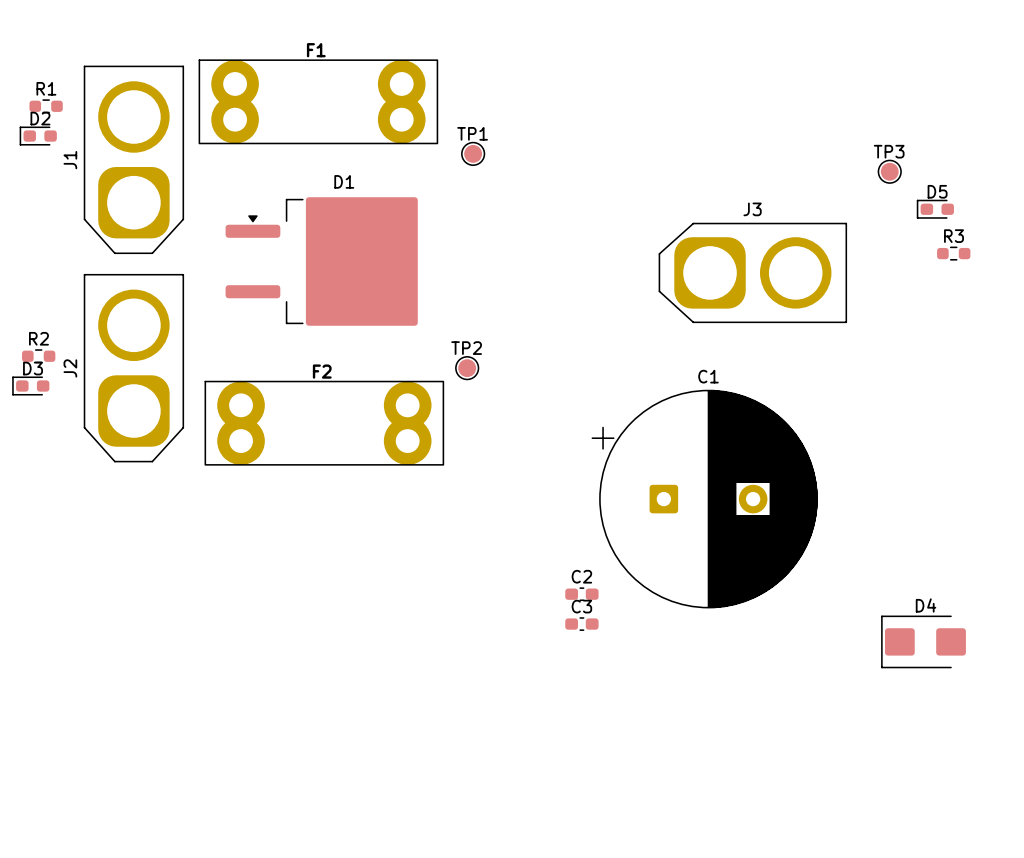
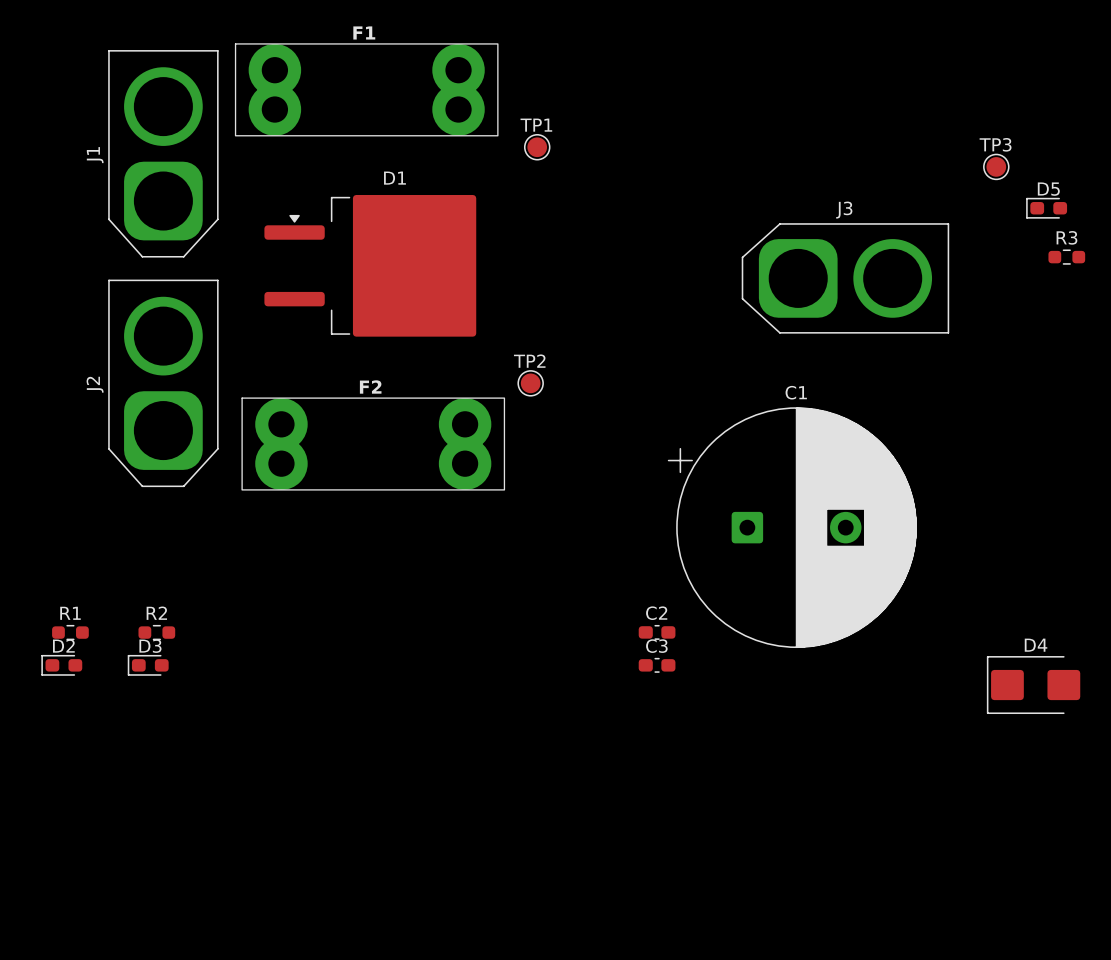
R1 position: (46, 106) -> (70, 632)
D2 position: (38, 136) -> (61, 665)
R2 position: (38, 356) -> (156, 632)
D3 position: (30, 386) -> (148, 665)

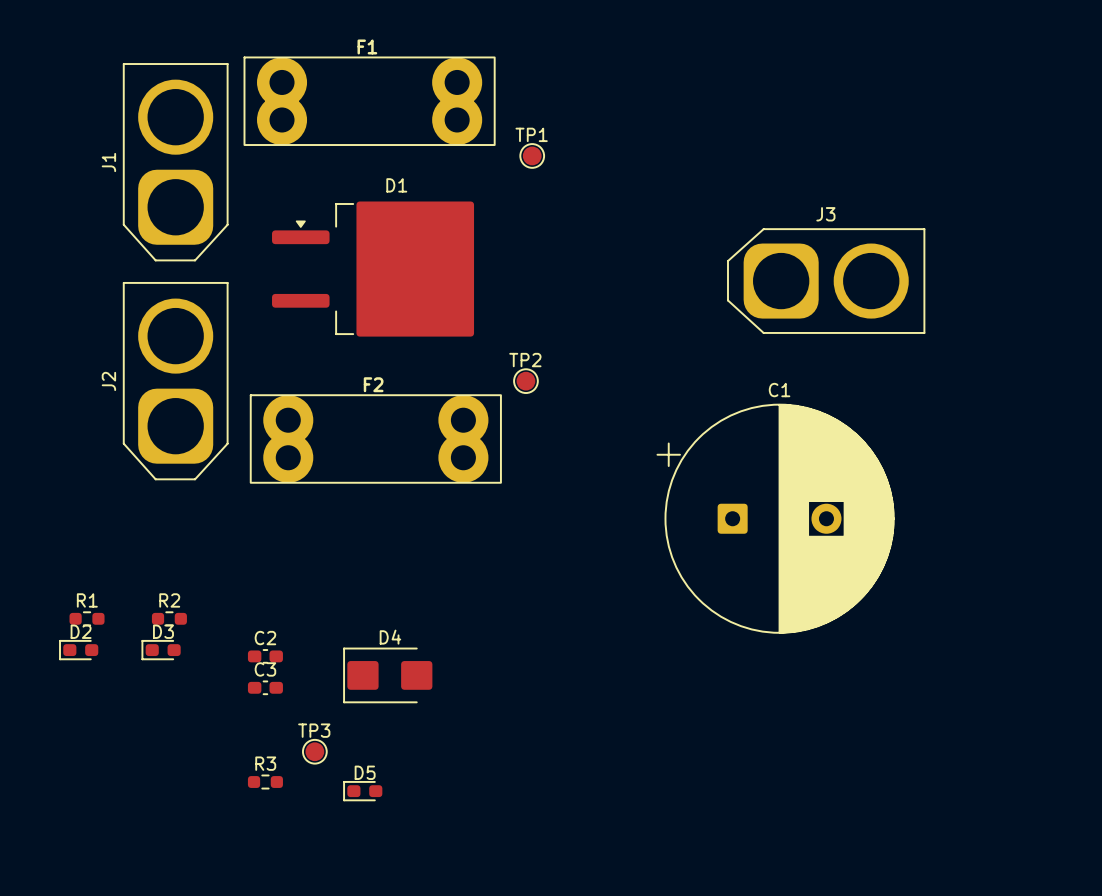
TP3 position: (996, 166) -> (314, 751)
D5 position: (1046, 208) -> (362, 791)
R3 position: (1066, 257) -> (265, 782)
C2 position: (657, 632) -> (265, 656)
C3 position: (657, 665) -> (265, 687)
D4 position: (1033, 685) -> (387, 675)

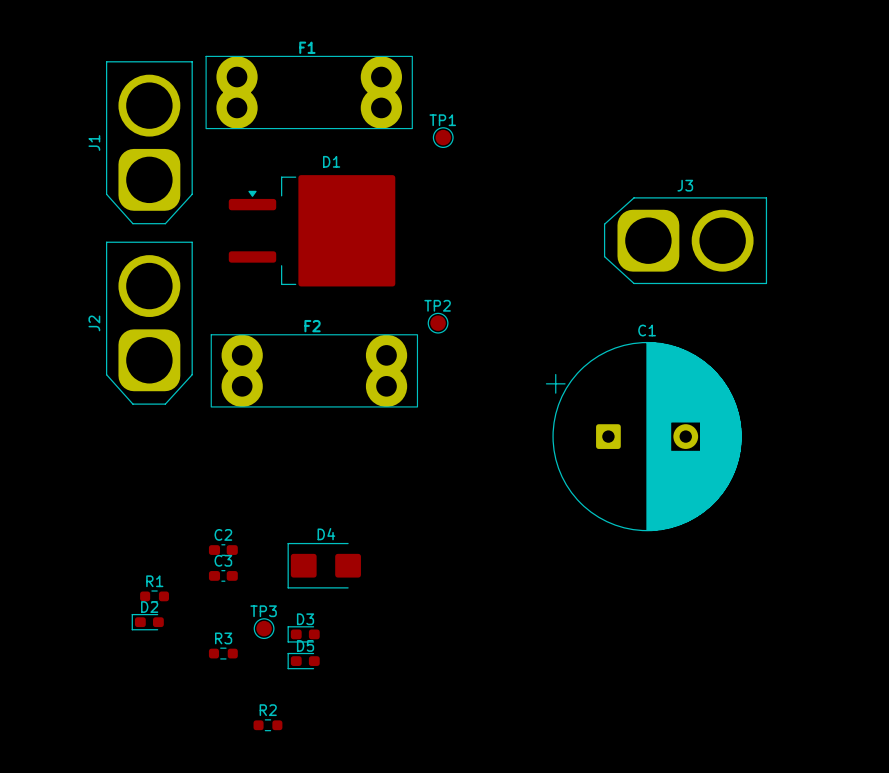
R1 position: (87, 618) -> (154, 596)
R2 position: (169, 618) -> (267, 725)
D2 position: (78, 650) -> (147, 622)
D3 position: (161, 650) -> (303, 634)

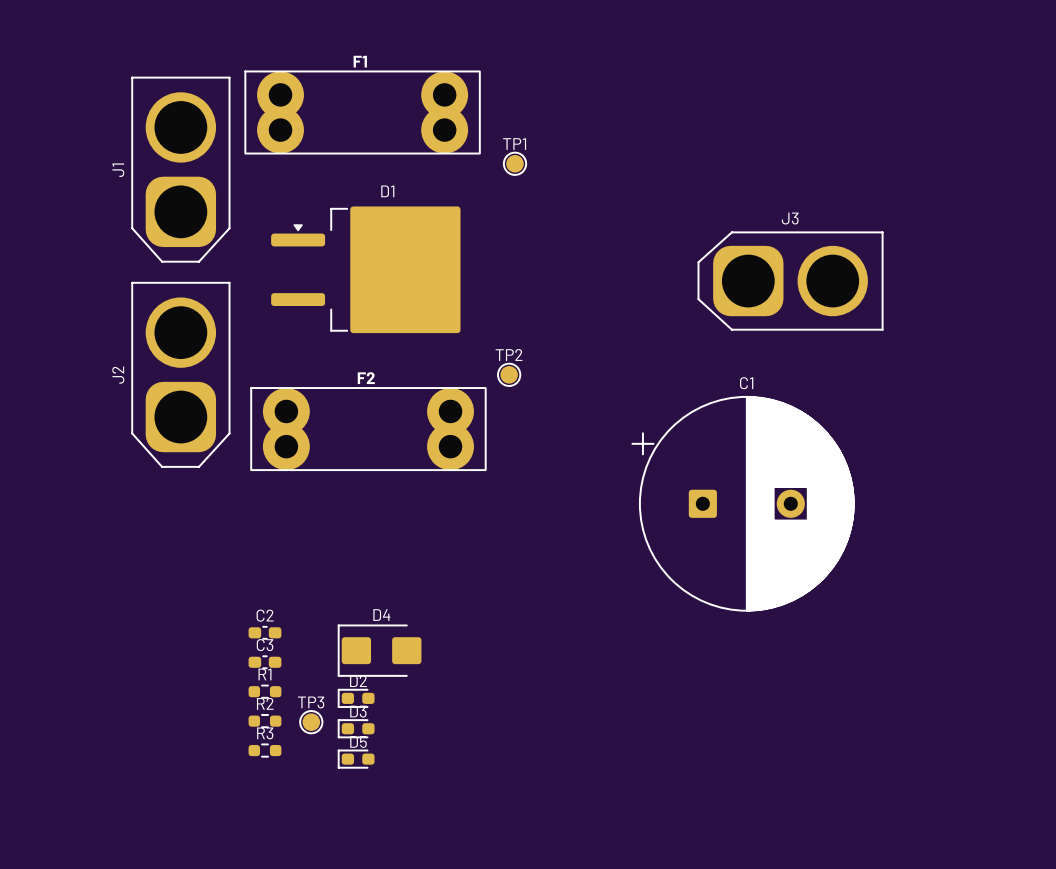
R1 position: (154, 596) -> (264, 691)
D2 position: (147, 622) -> (356, 698)
R2 position: (267, 725) -> (264, 721)

